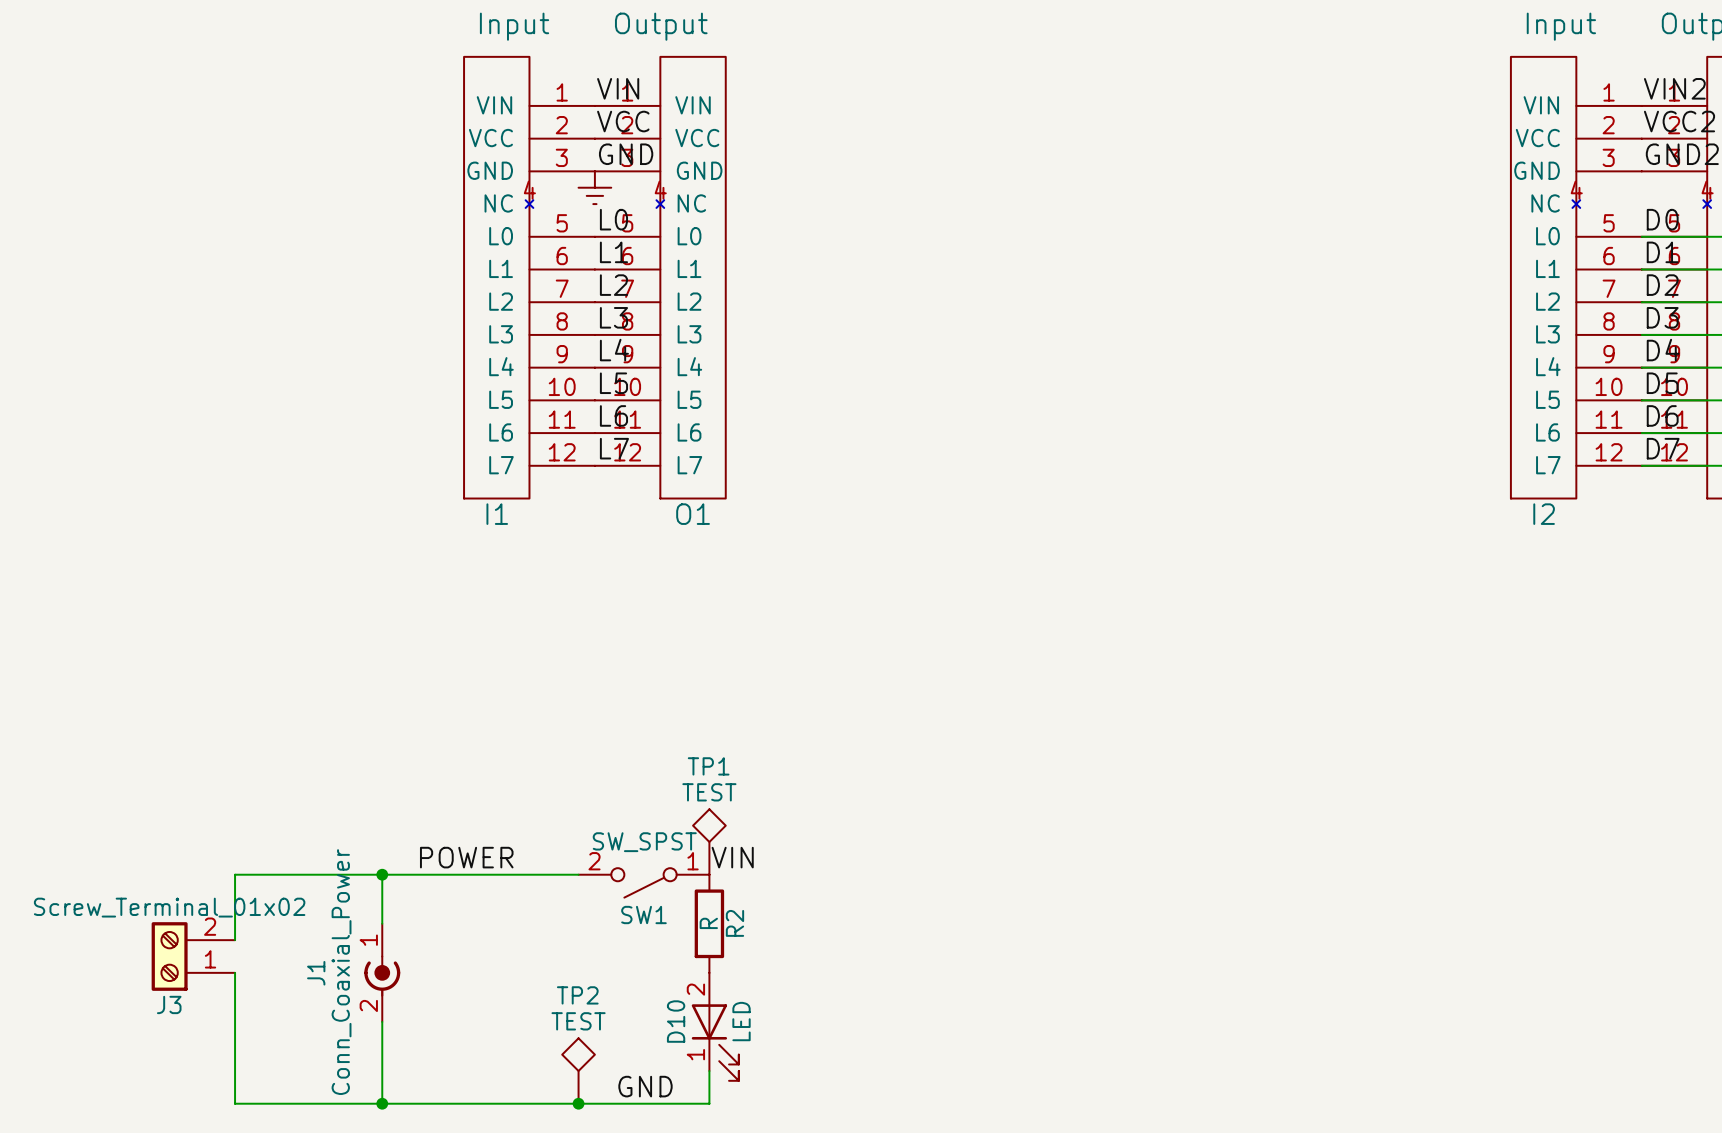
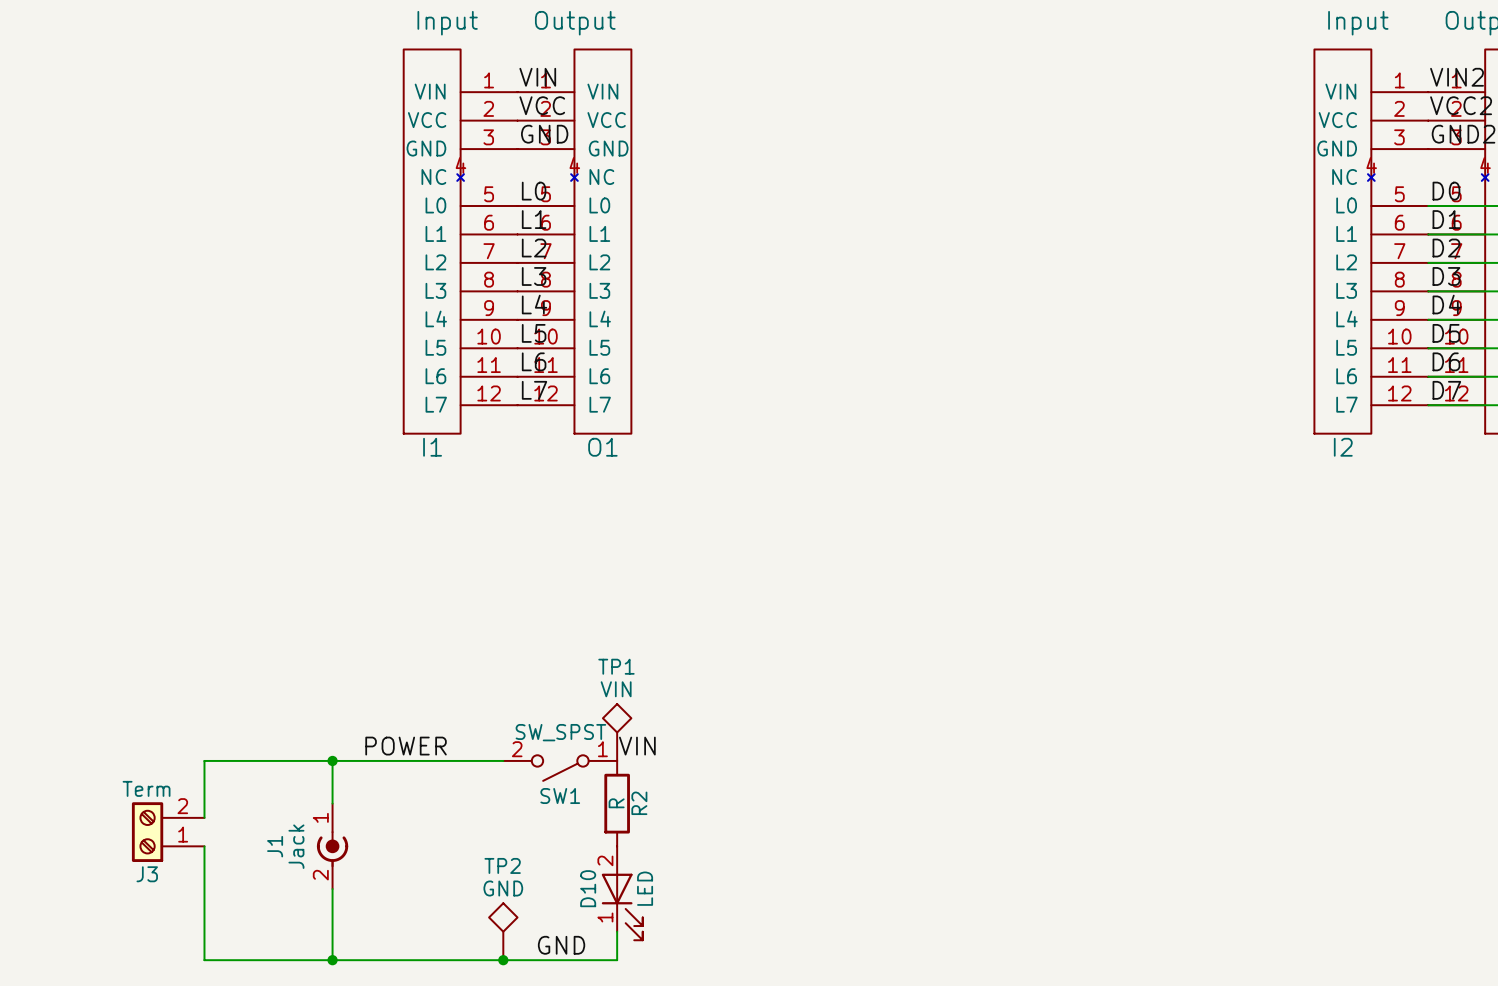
power symbol: (594, 187) -> none
TP1 value: TEST (709, 792) -> VIN (616, 689)
J3 value: Screw_Terminal_01x02 (169, 907) -> Term (146, 788)
J1 value: Conn_Coaxial_Power (341, 972) -> Jack (296, 846)
TP2 value: TEST (578, 1021) -> GND (503, 888)

